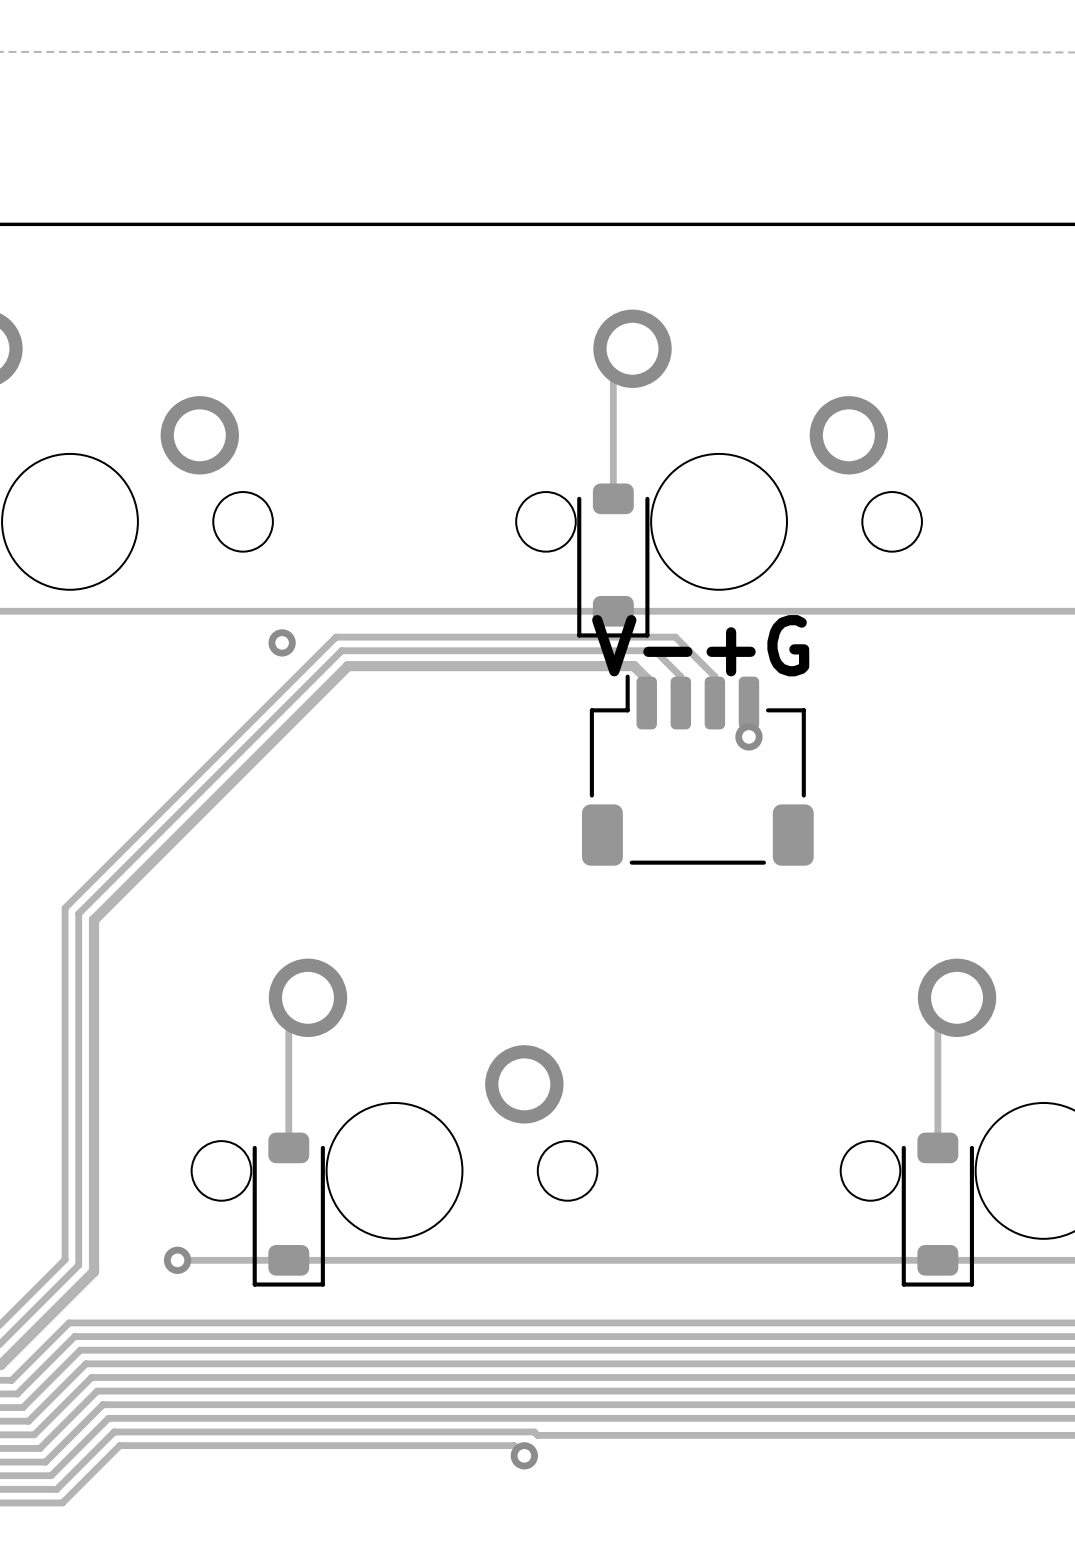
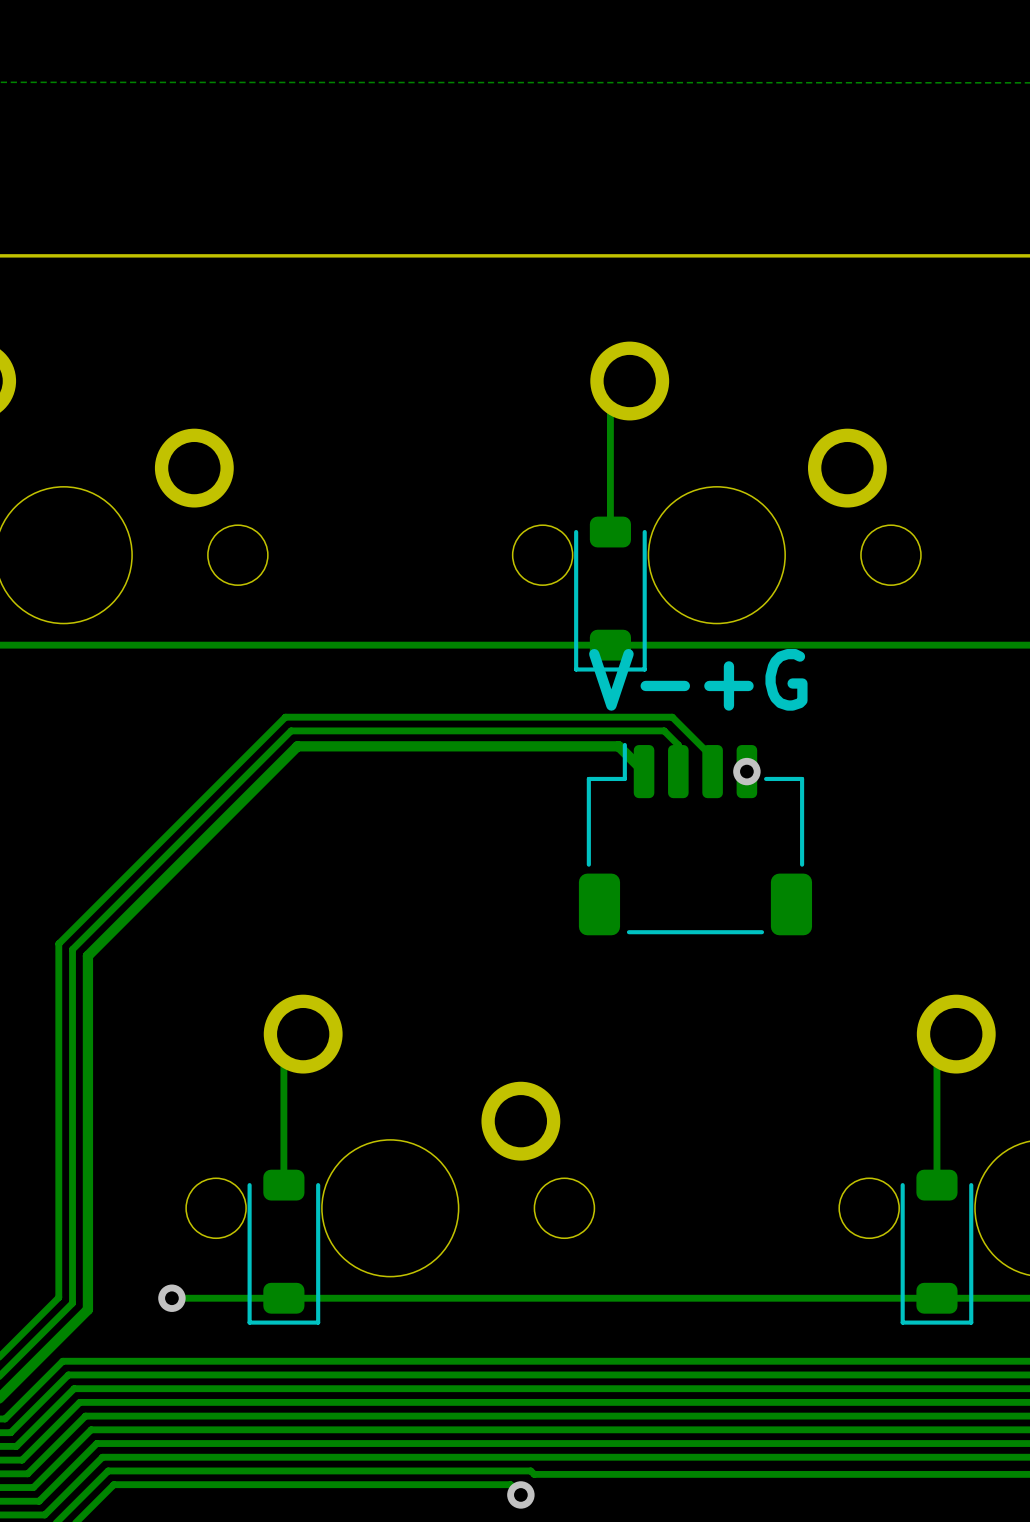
via: (282, 642) -> none
track: (290, 682) (336, 637) (675, 637) (714, 676) (714, 703) -> (285, 717) (672, 717) (712, 757) (712, 771)
track: (295, 696) (341, 650) (654, 650) (680, 676) (680, 703) -> (291, 730) (664, 730) (678, 745) (678, 771)
track: (646, 703) (646, 678) (633, 666) (348, 666) (302, 711) -> (644, 771) (618, 746) (297, 746)
part position: (697, 770) -> (695, 839)

